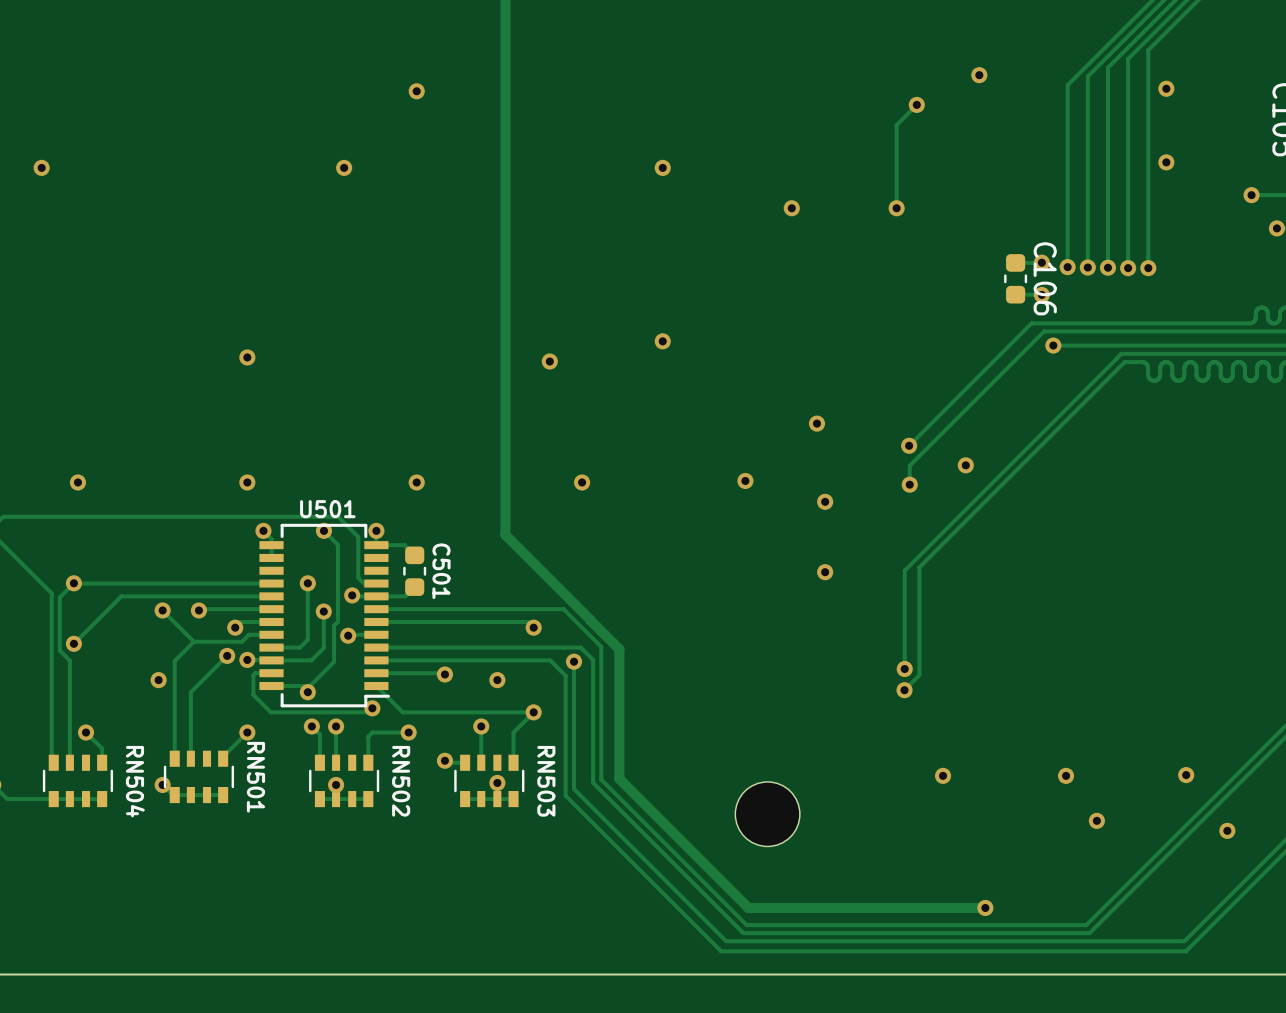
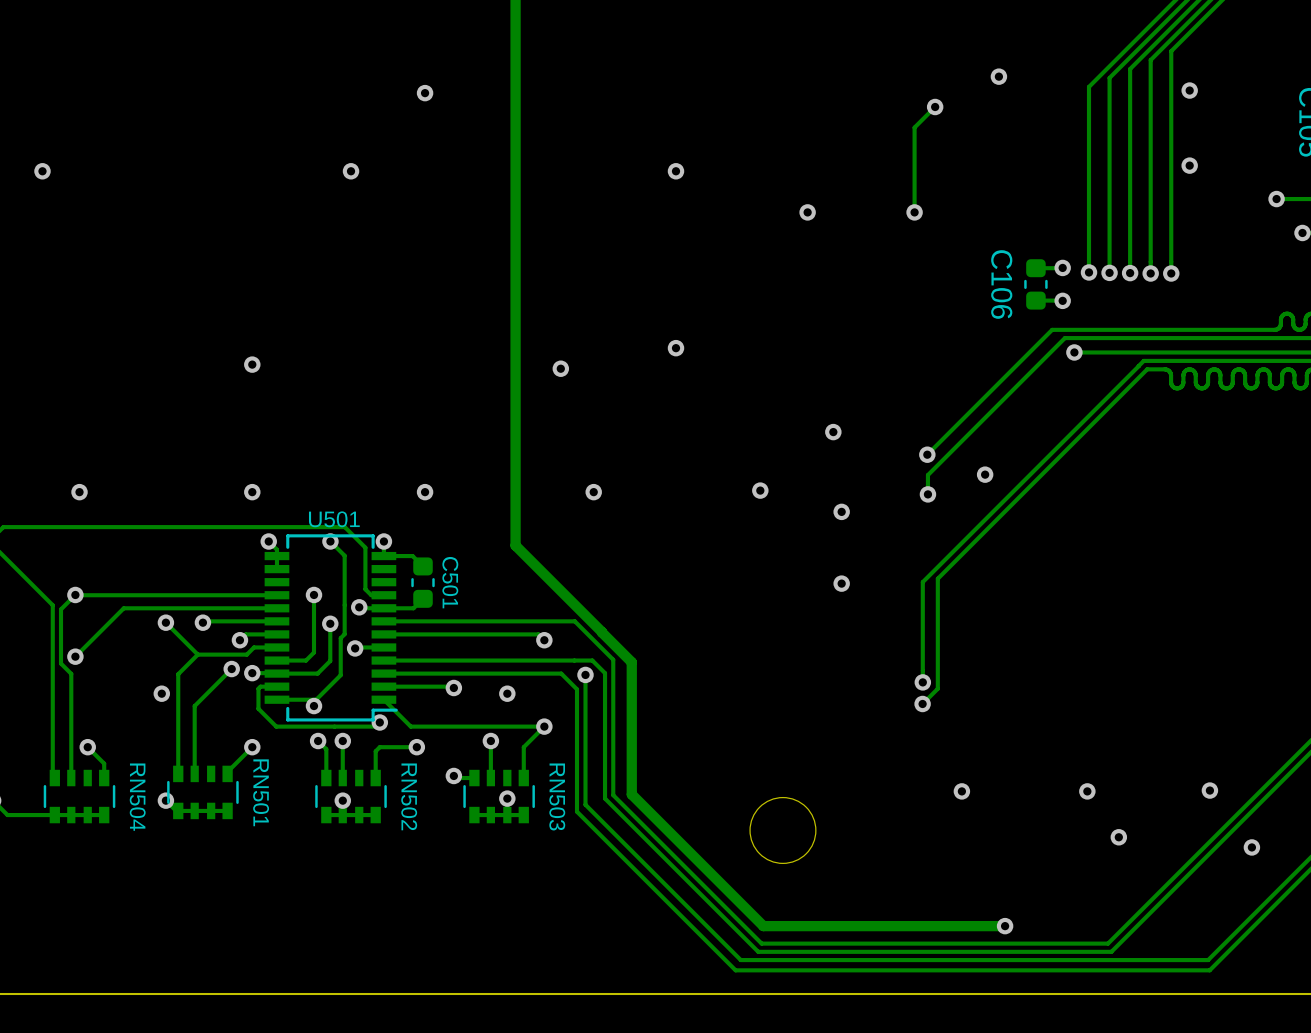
C106 name position: C106 (1045, 278) -> C106 (1001, 284)

